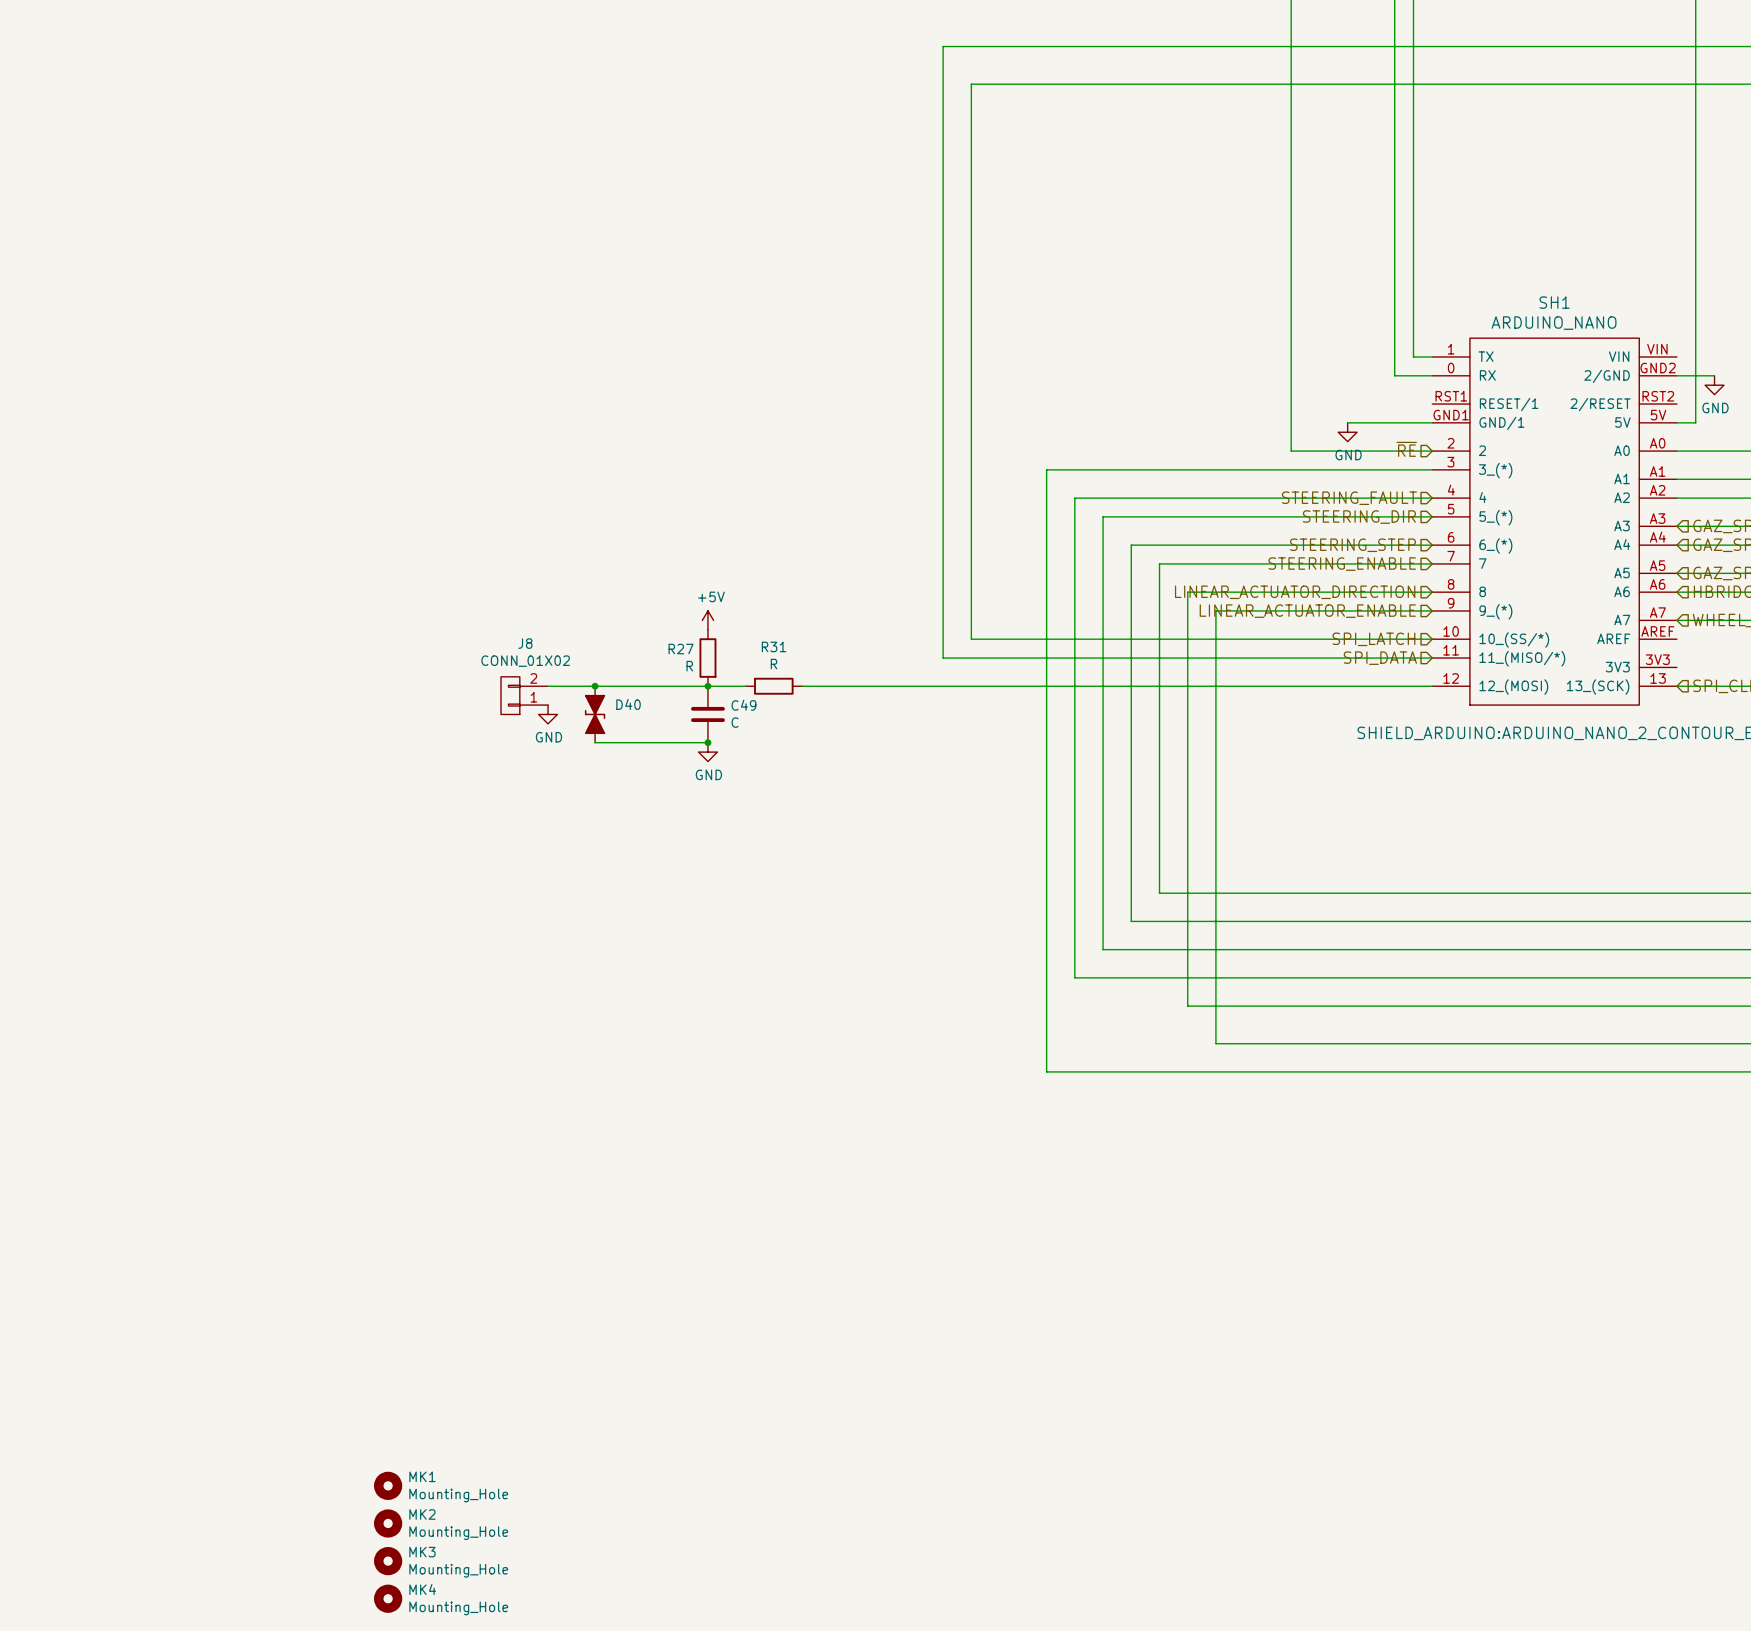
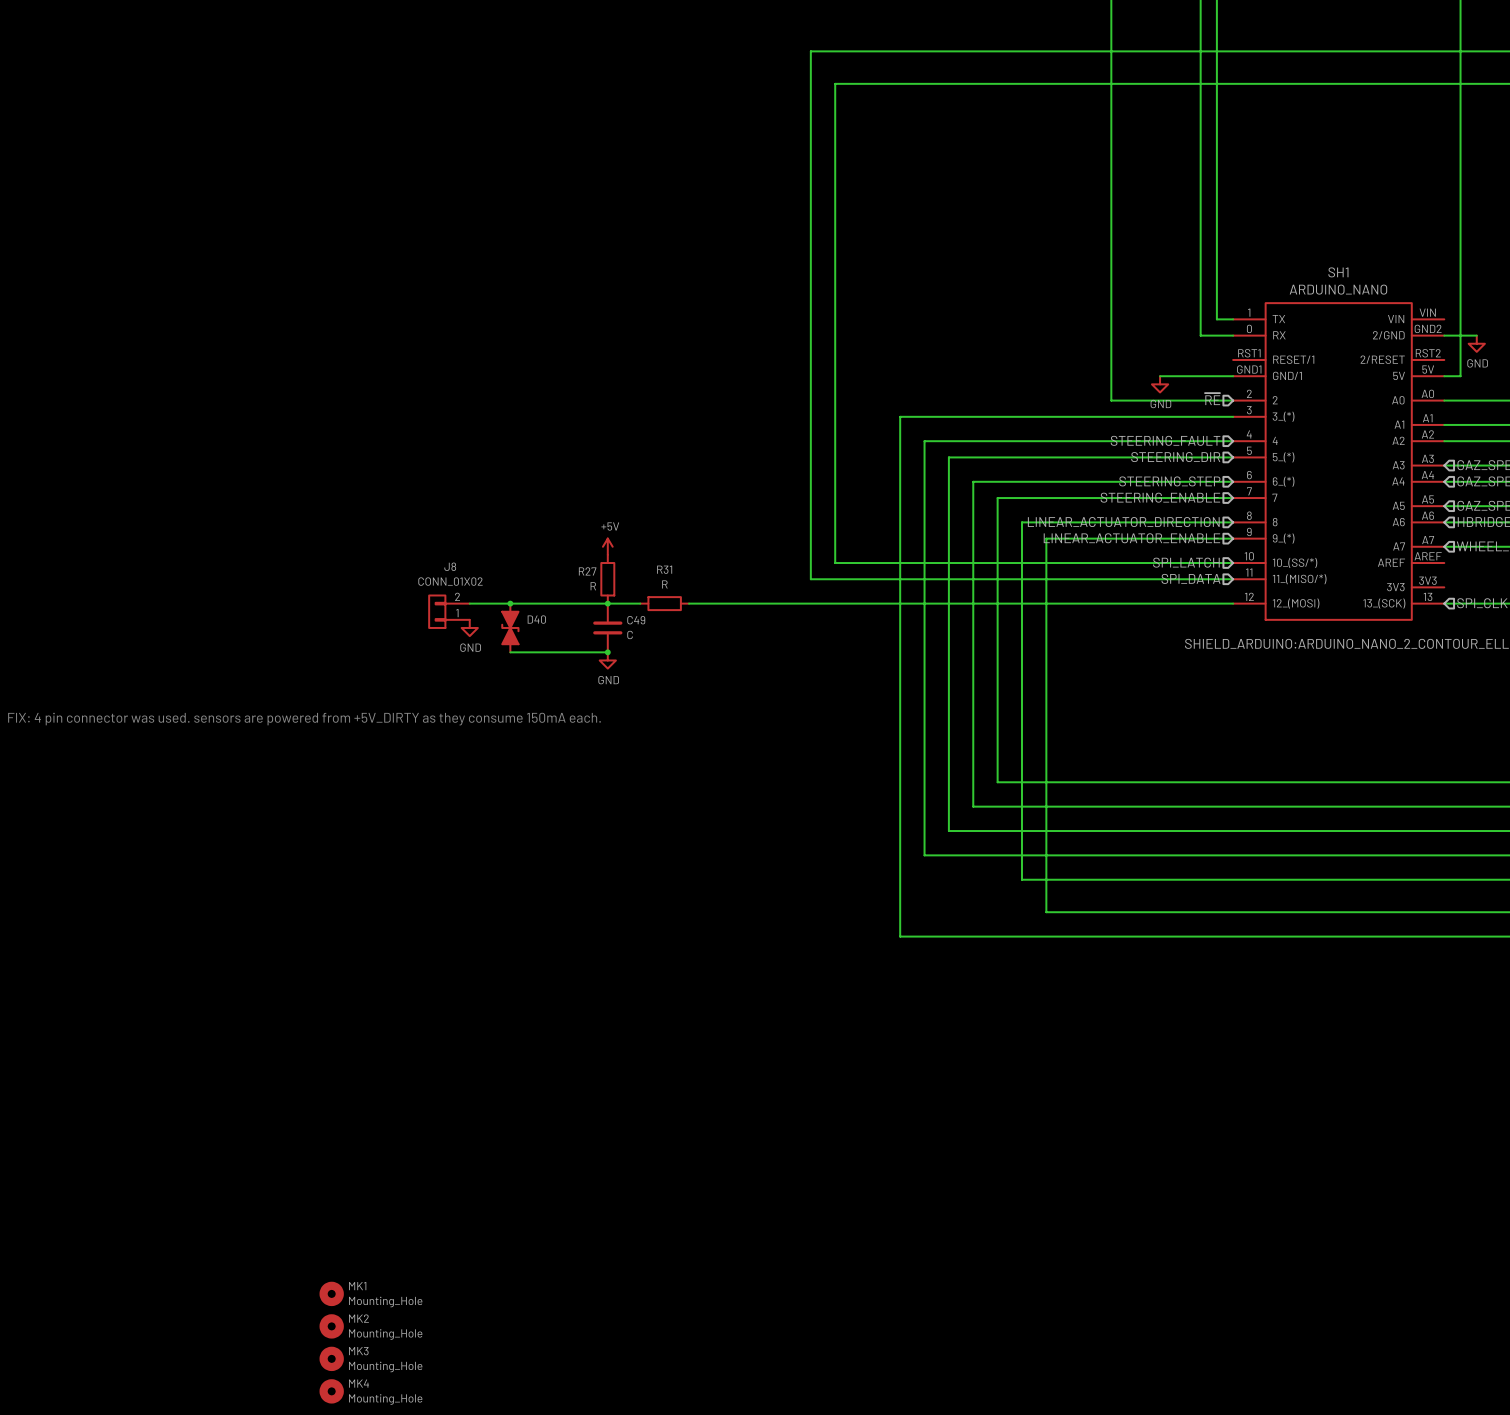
text: none -> FIX: 4 pin connector was used. sensors are powered from +5V_DIRTY as they consume 150mA each. (304, 719)

